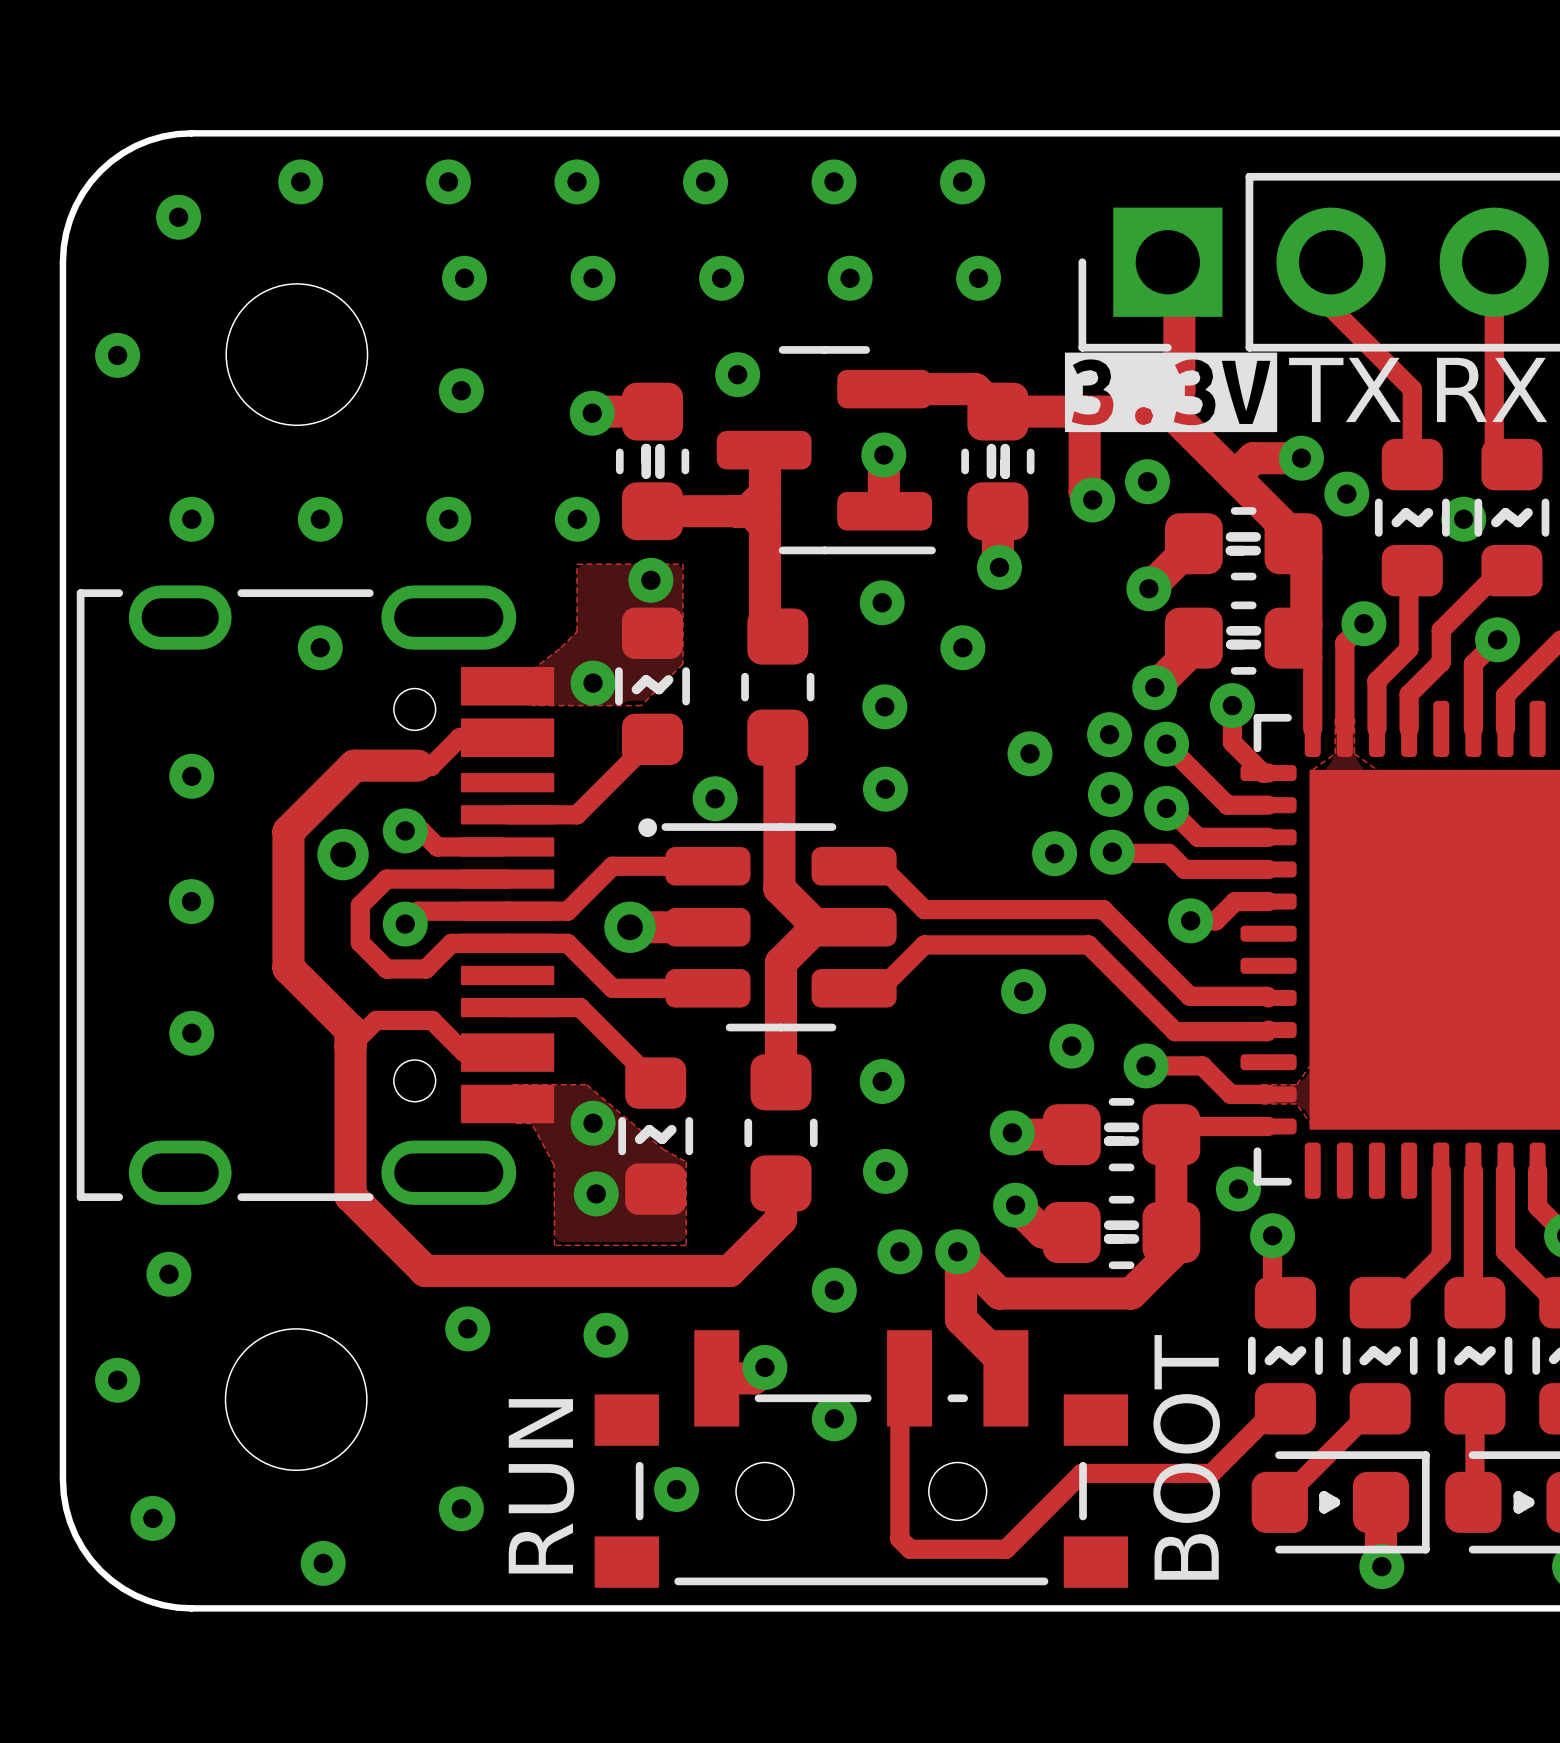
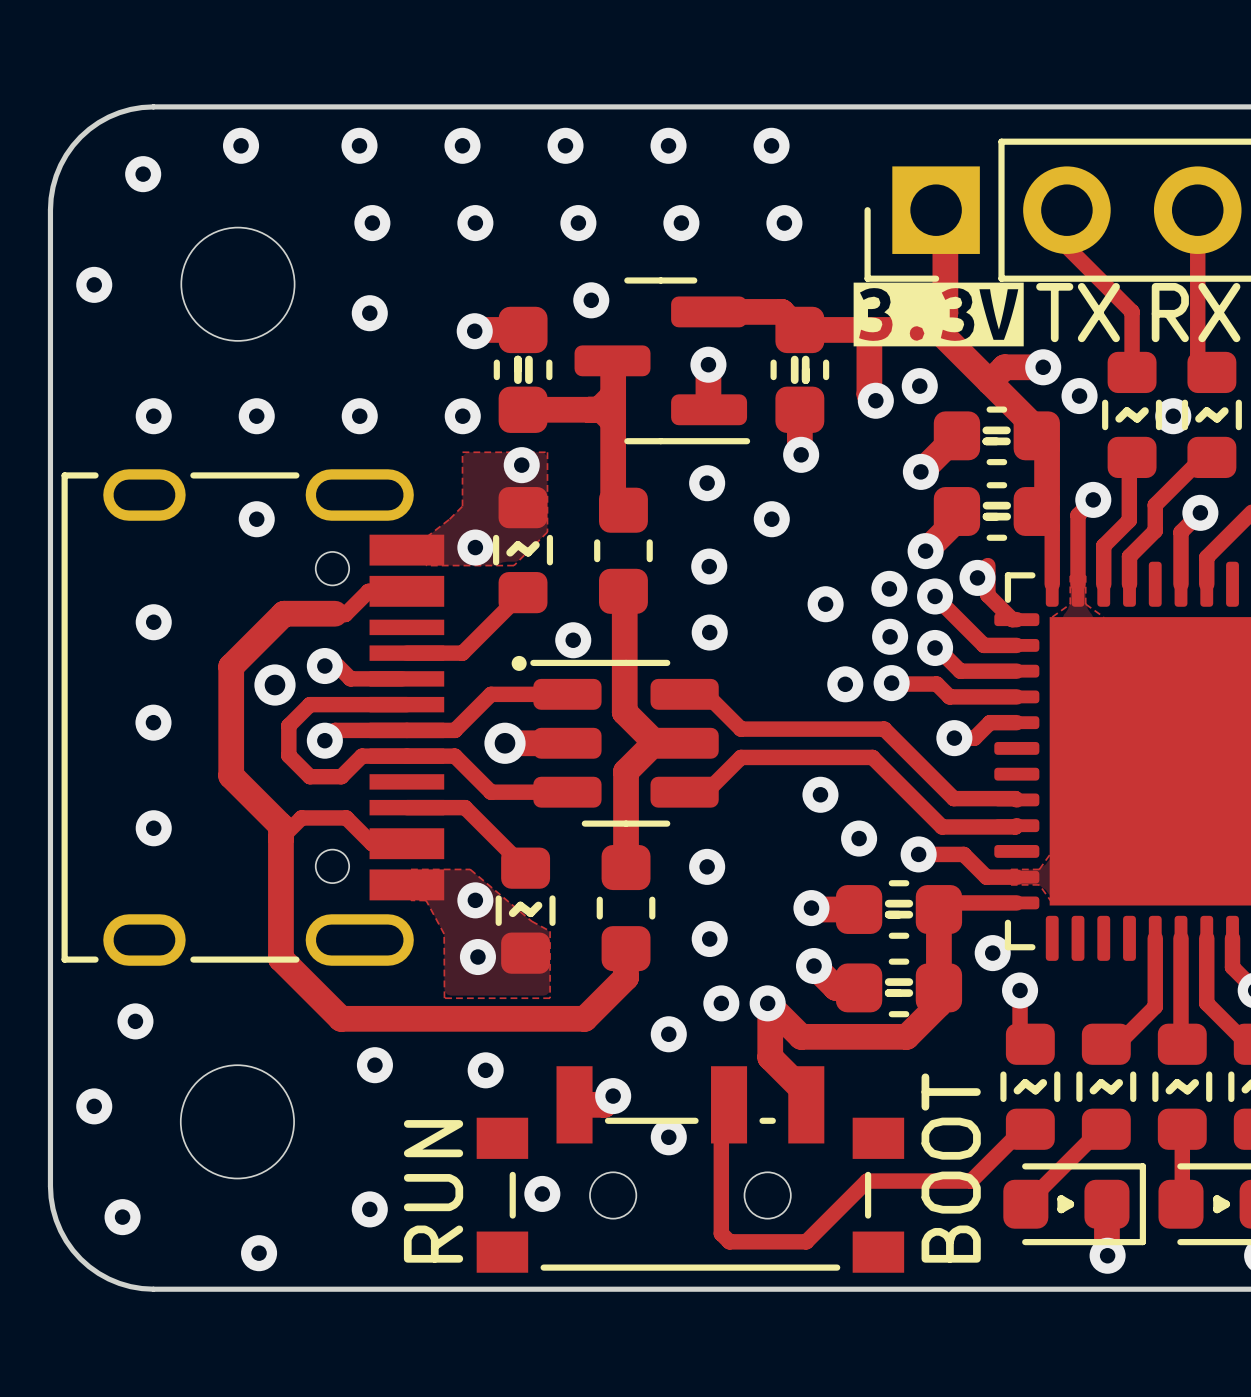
via position: (1232, 705) -> (977, 577)

